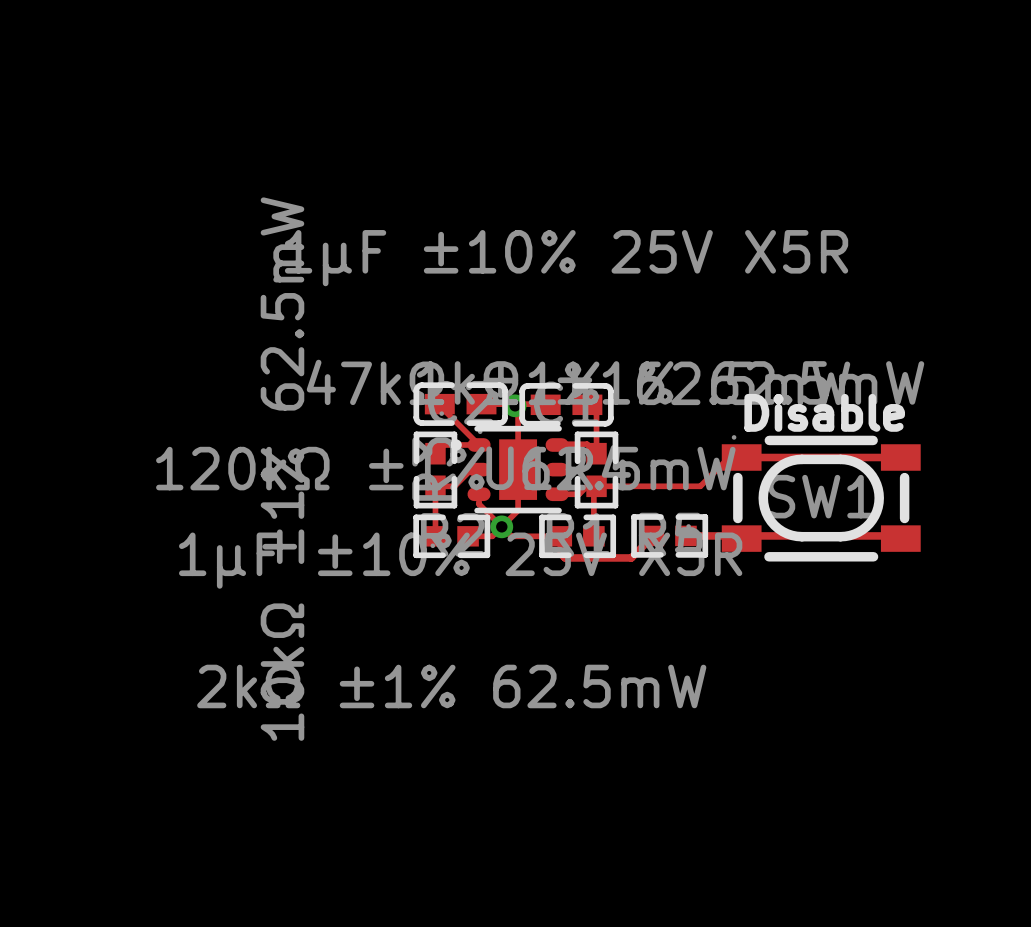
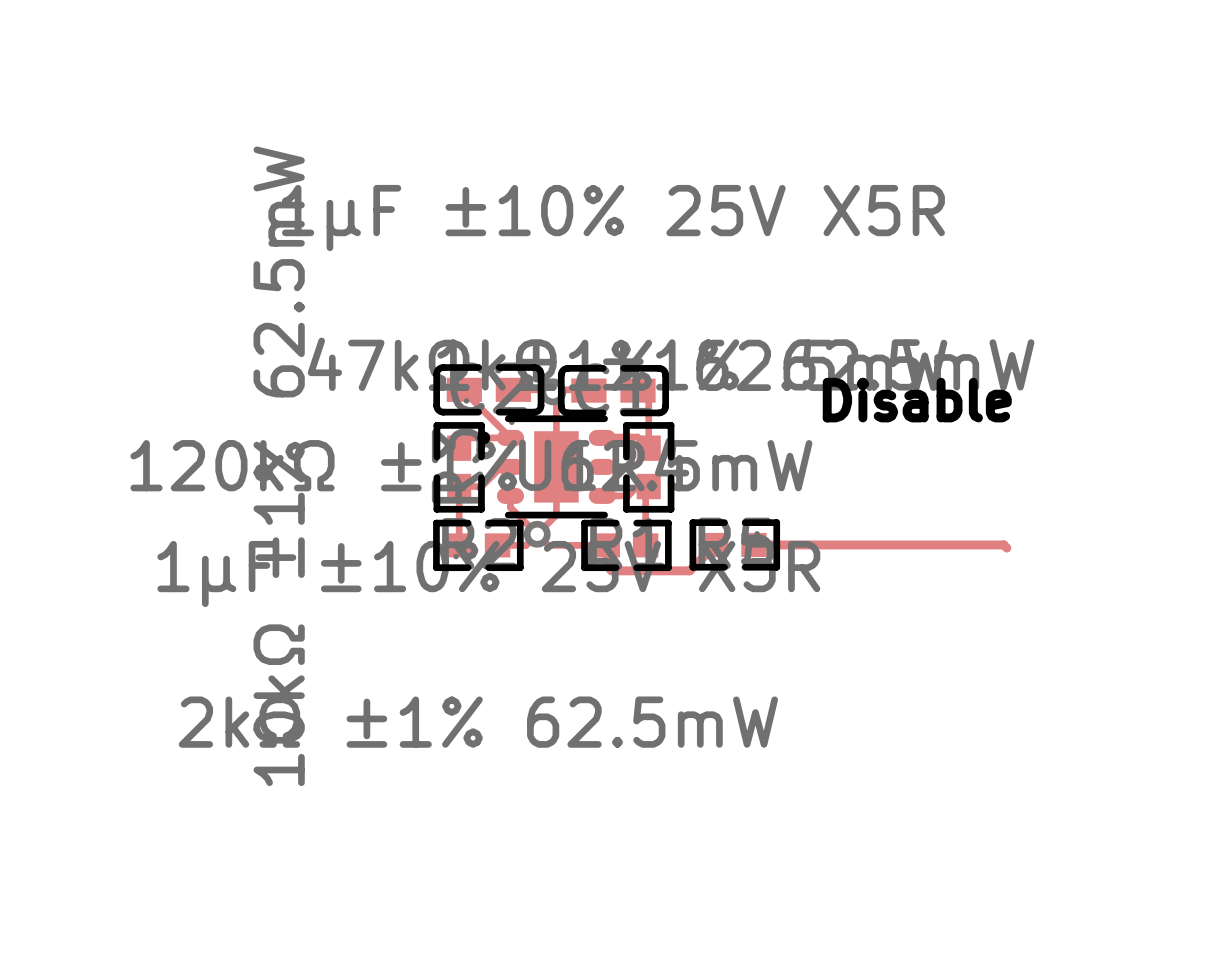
top track: (900, 457) (729, 457) (700, 486) (596, 486) -> none
SW1: (821, 498) -> none

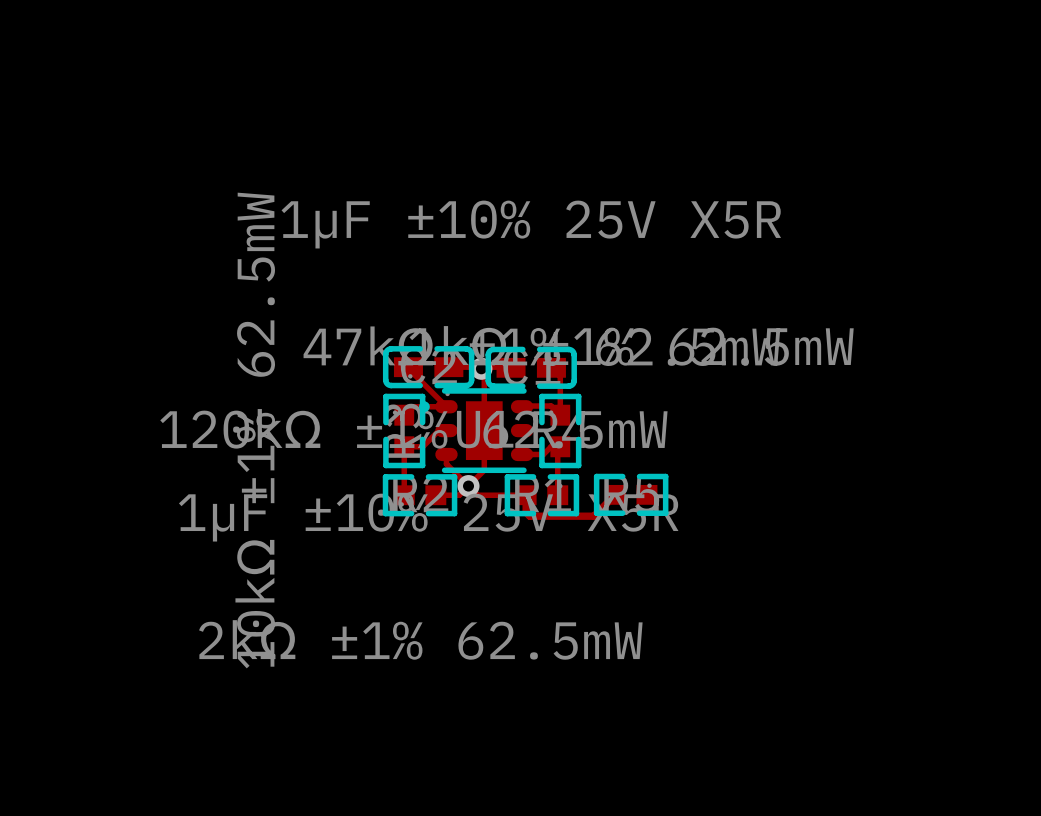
text: Disable (917, 400) -> none
top track: (753, 544) (1003, 544) (1006, 548) -> none

